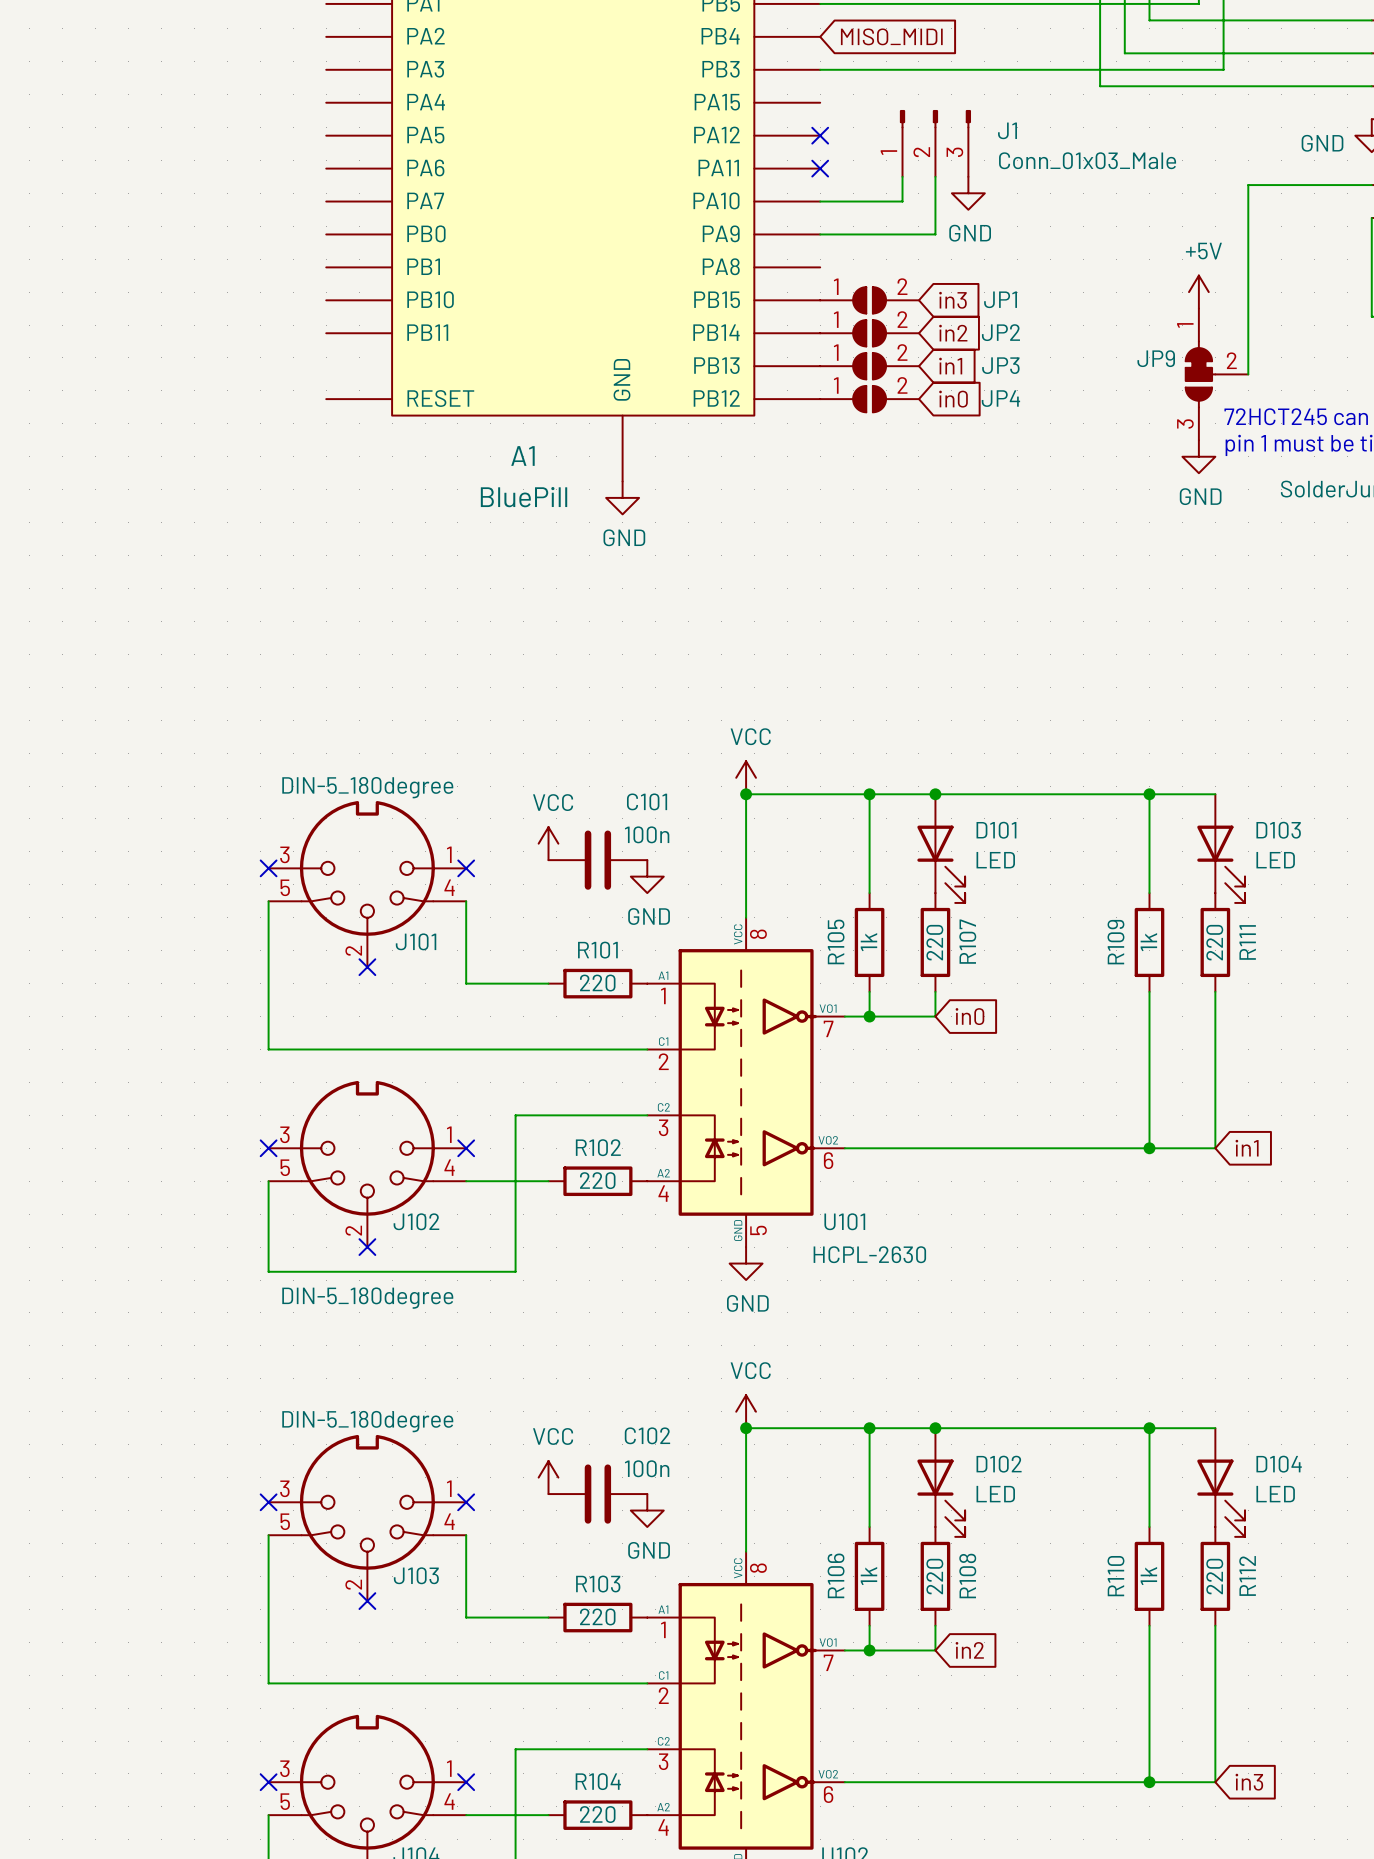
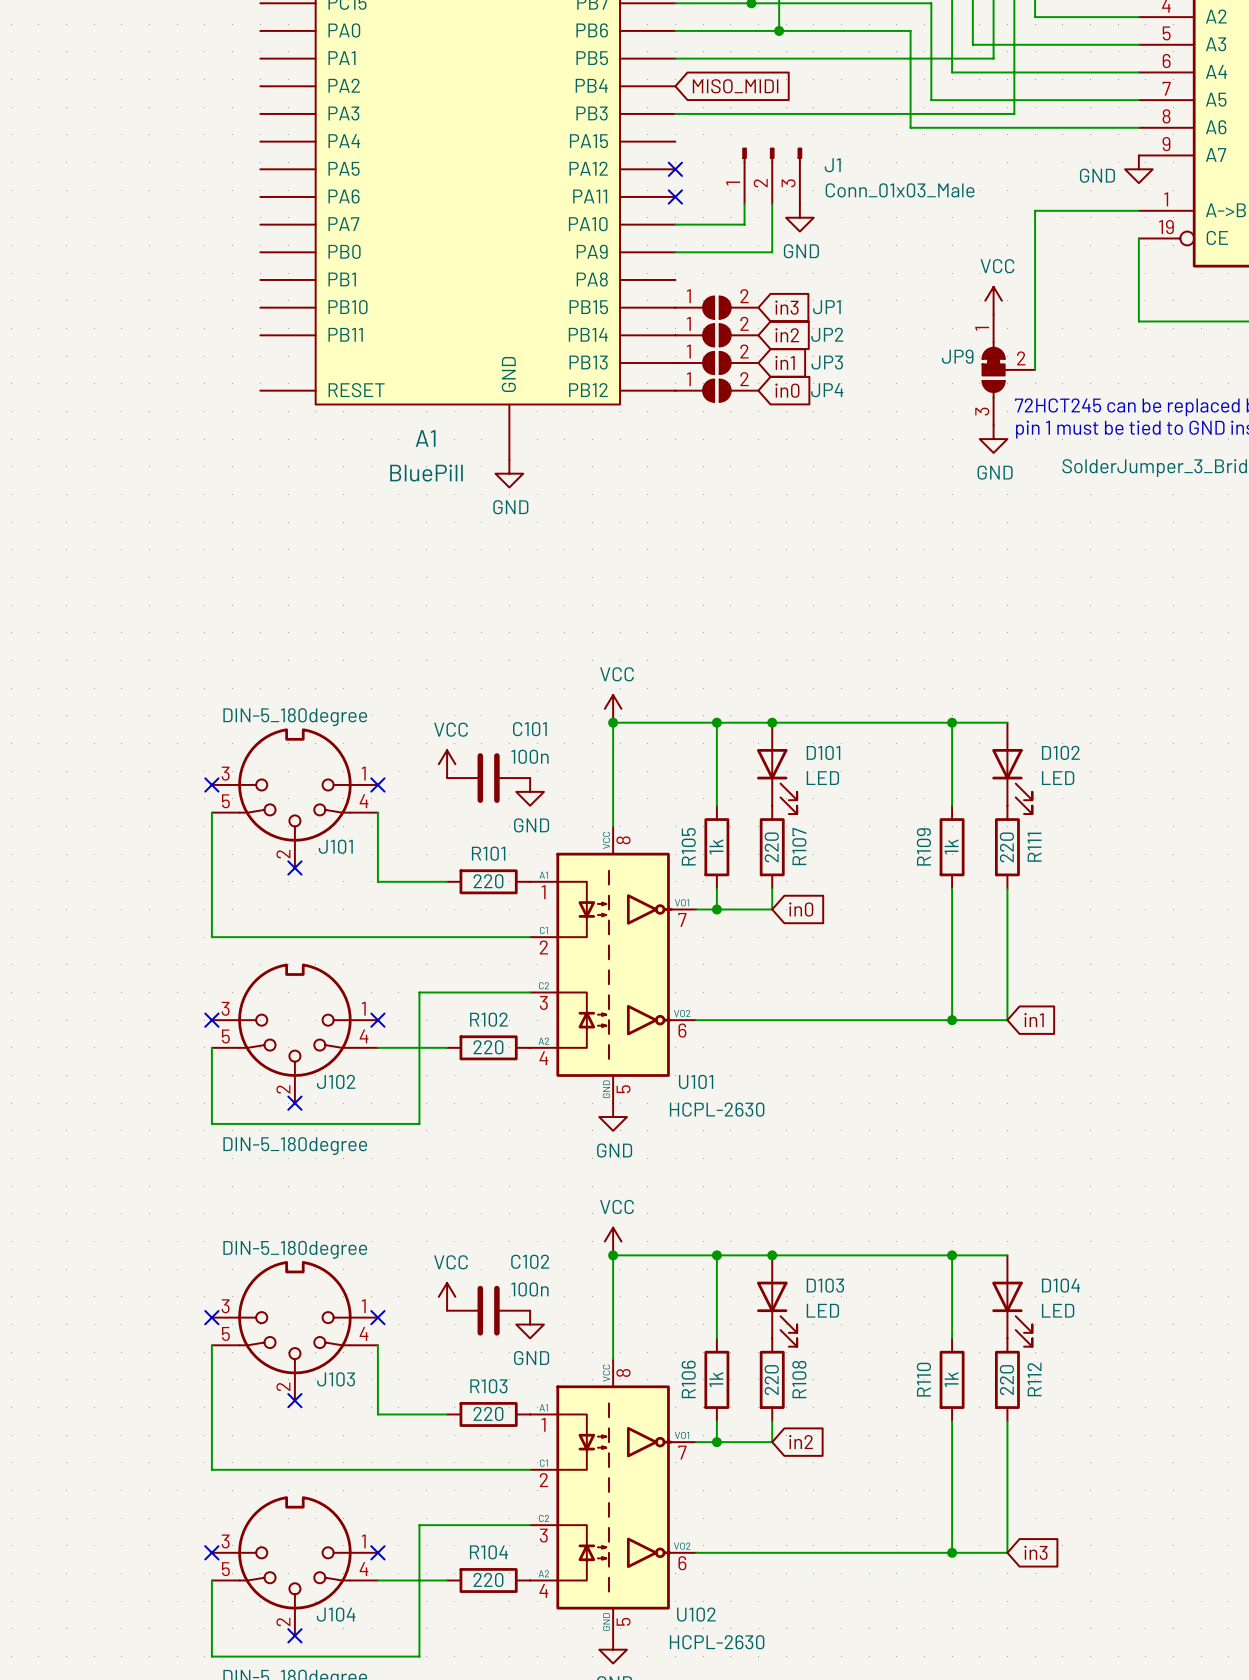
power symbol: +5V (1198, 292) -> VCC (993, 300)
D103 name: D103 (1278, 830) -> D102 (1060, 752)
D102 name: D102 (999, 1464) -> D103 (825, 1285)

